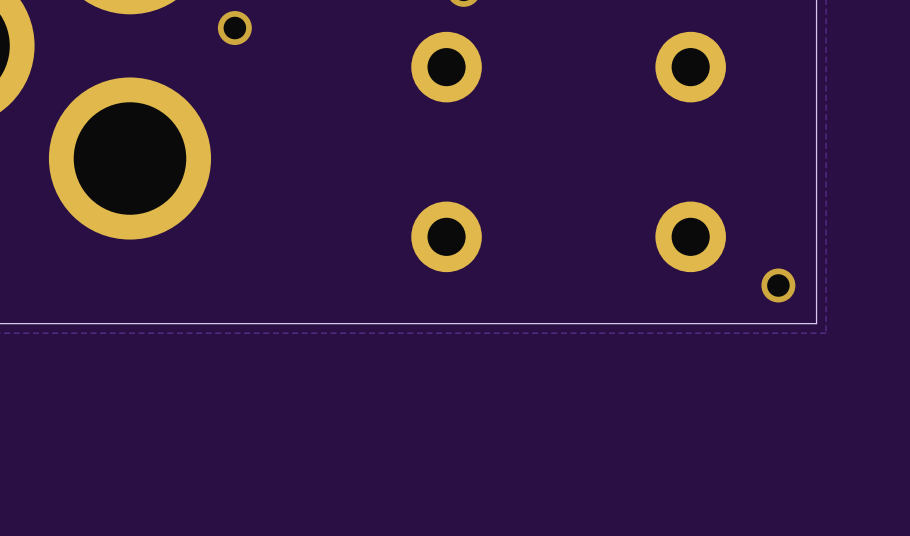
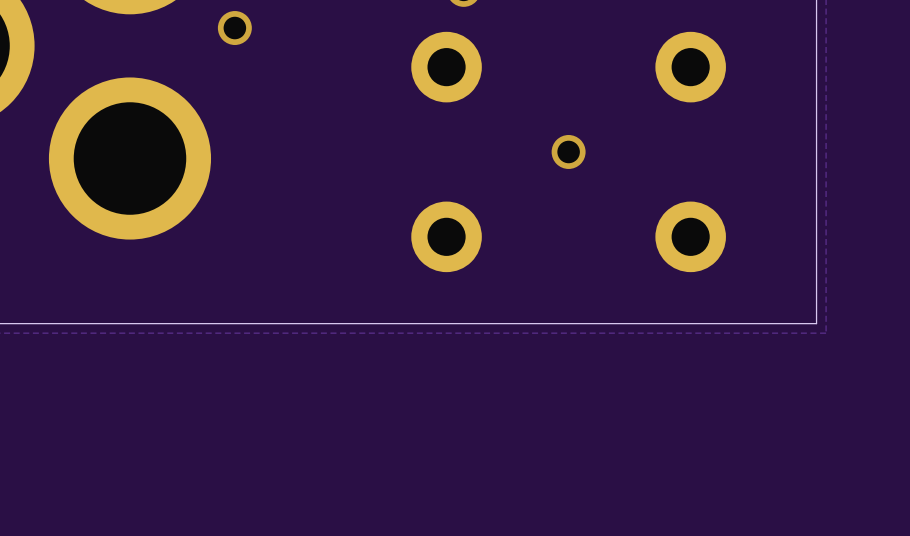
via: none -> (568, 151)
via: (778, 285) -> none

